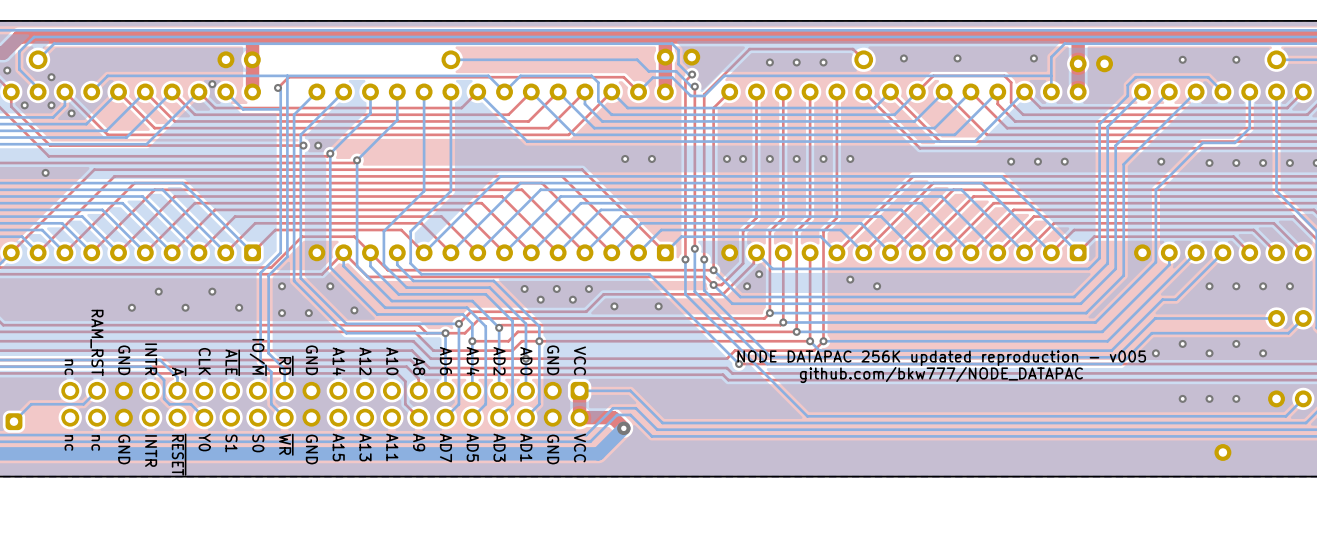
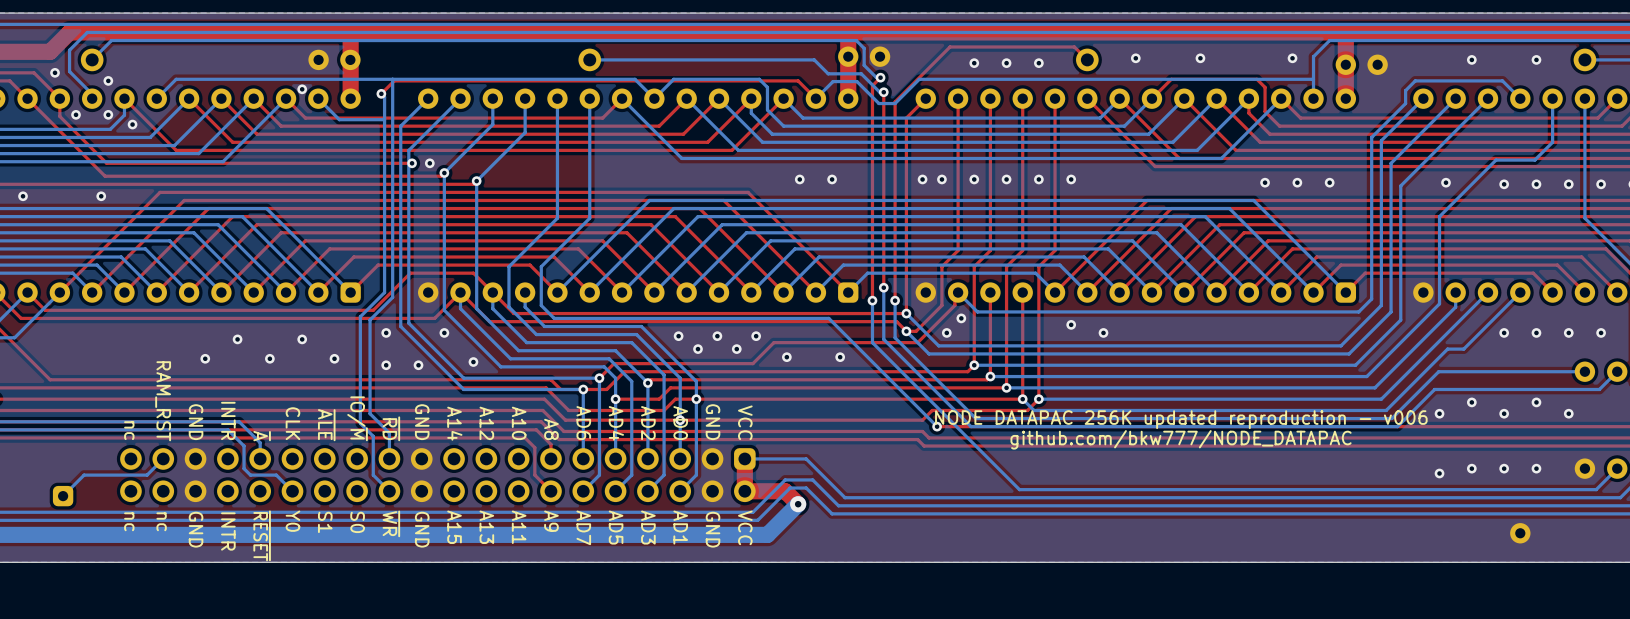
text: NODE DATAPAC 256K updated reproduction - v005 (941, 358) -> NODE DATAPAC 256K updated reproduction - v006 (1181, 419)
via: none -> (1439, 473)

